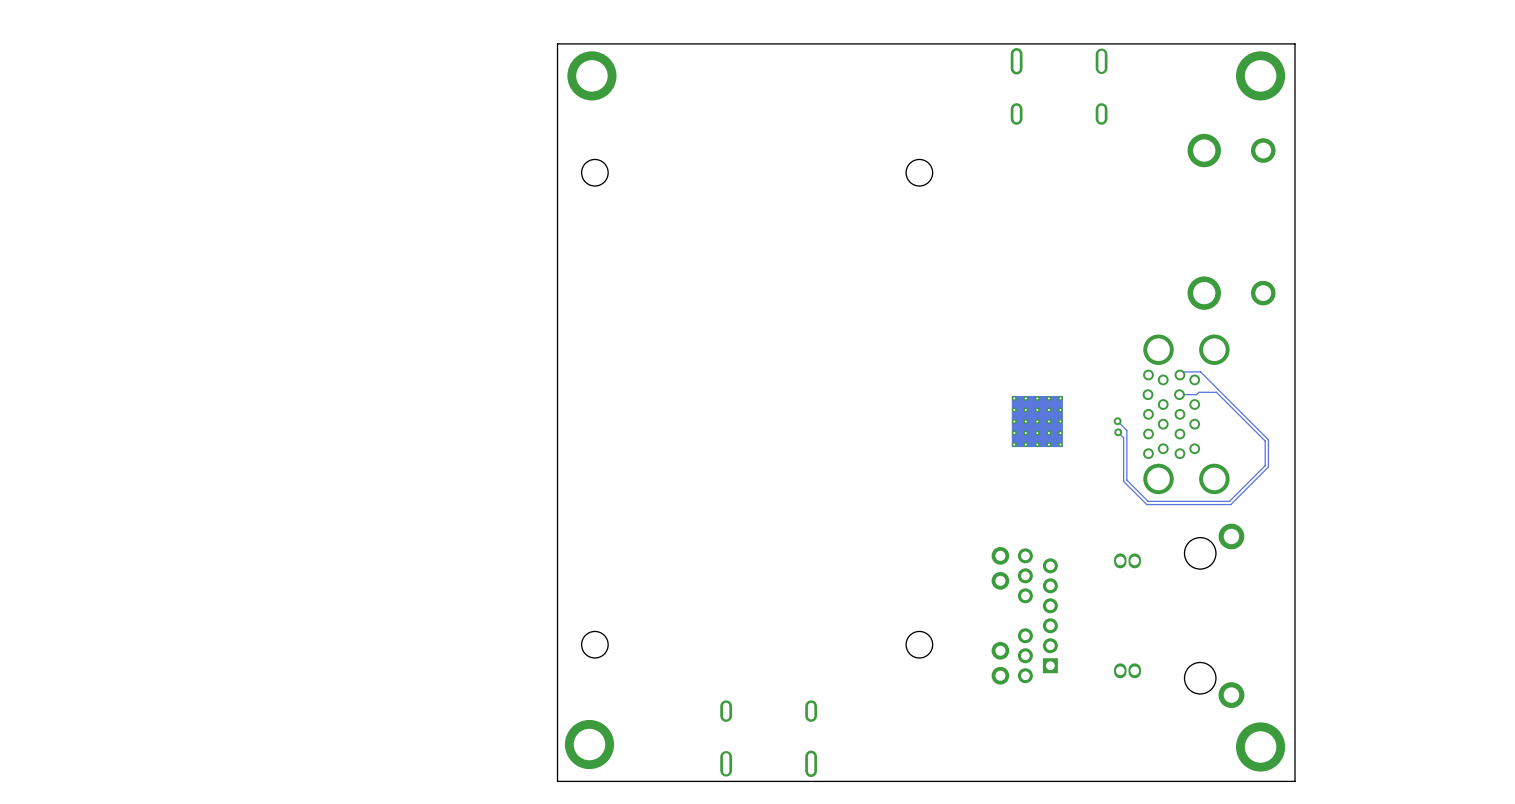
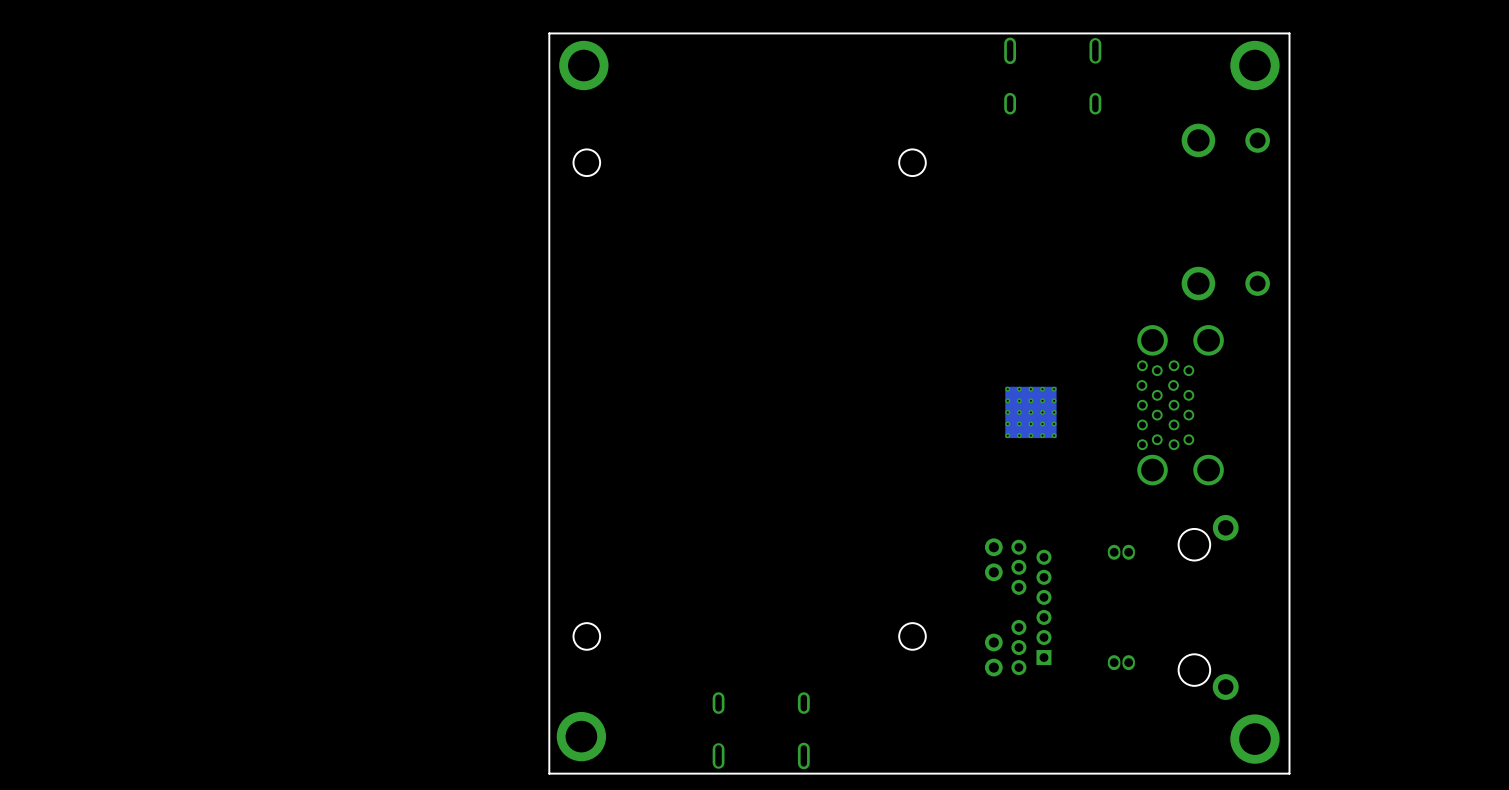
track: (1179, 375) (1183, 371) (1200, 371) (1268, 439) (1268, 467) (1230, 504) (1146, 504) (1123, 481) (1123, 437) (1118, 432) -> none
track: (1179, 394) (1216, 392) (1265, 441) (1265, 465) (1229, 501) (1148, 501) (1126, 480) (1126, 430) (1117, 421) -> none
via: (1117, 421) -> none
via: (1118, 432) -> none

